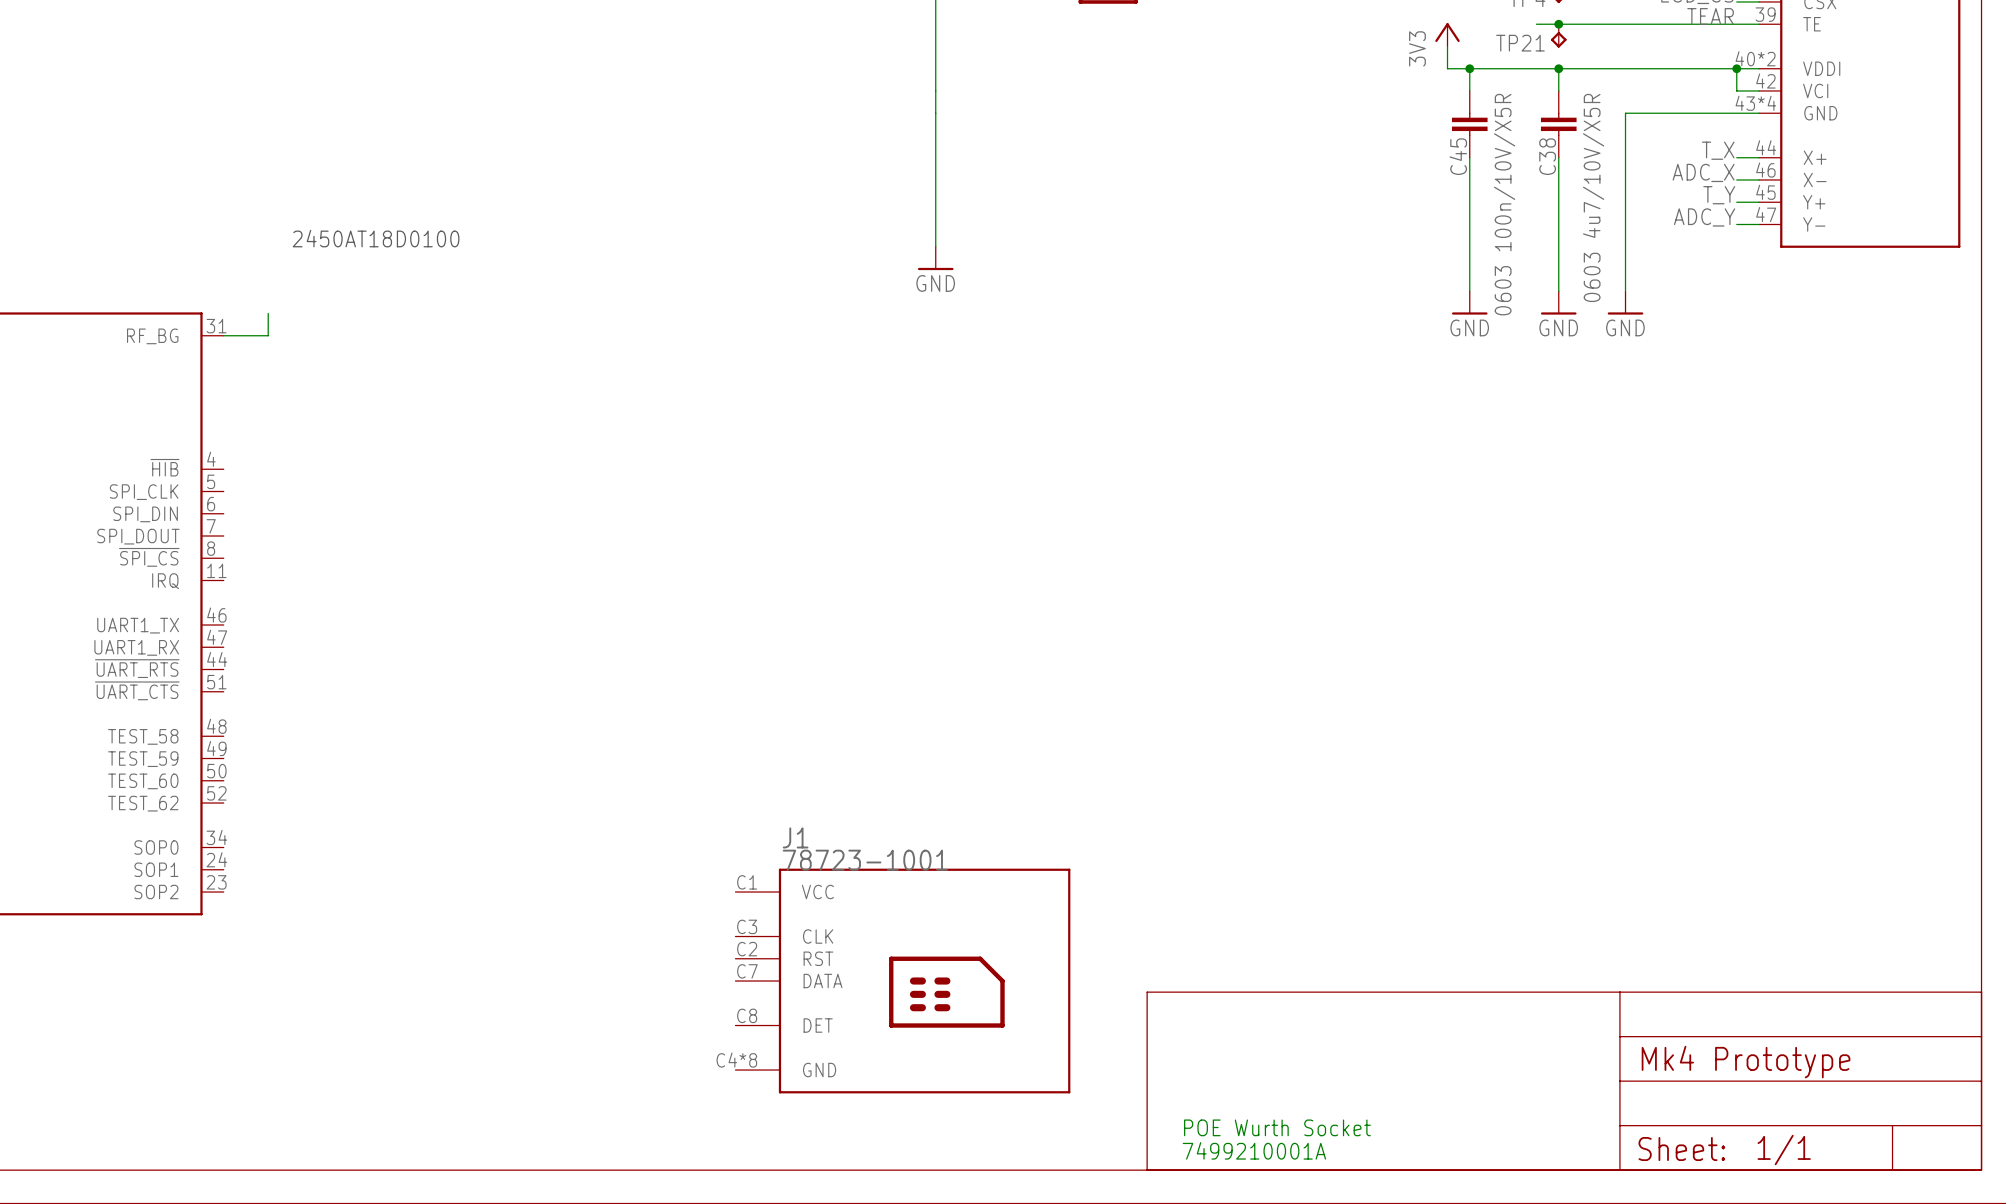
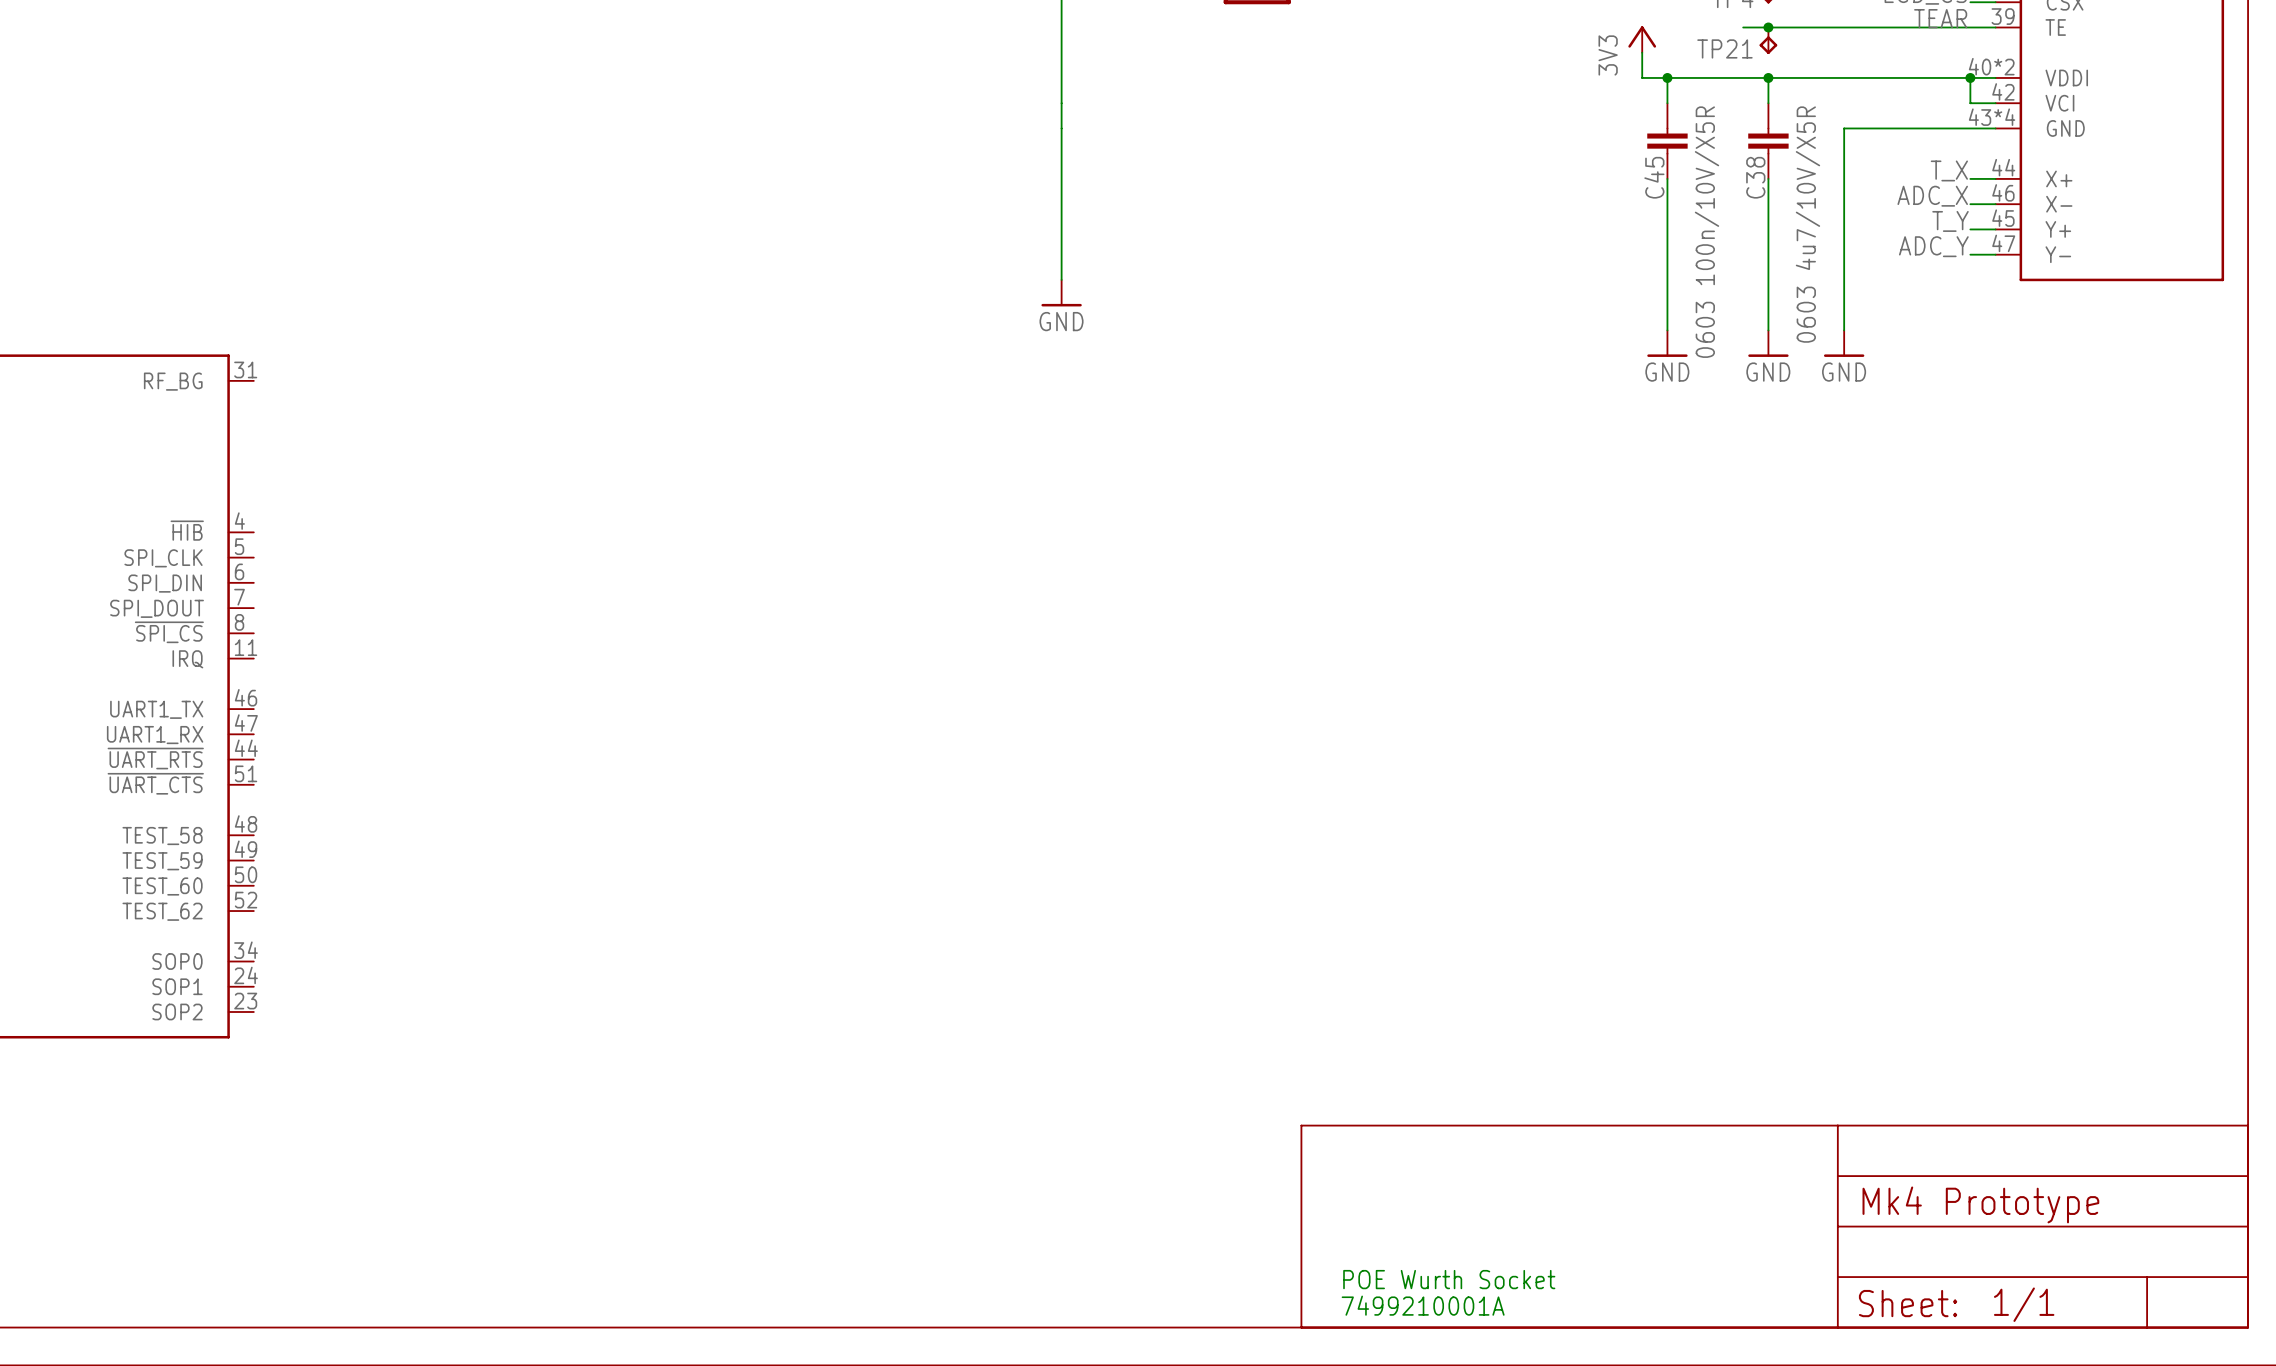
text: 2450AT18D0100 (376, 238) -> none
wire: (268, 313) (268, 335) (223, 335) -> none
J1: 78723-1001 (902, 981) -> none

